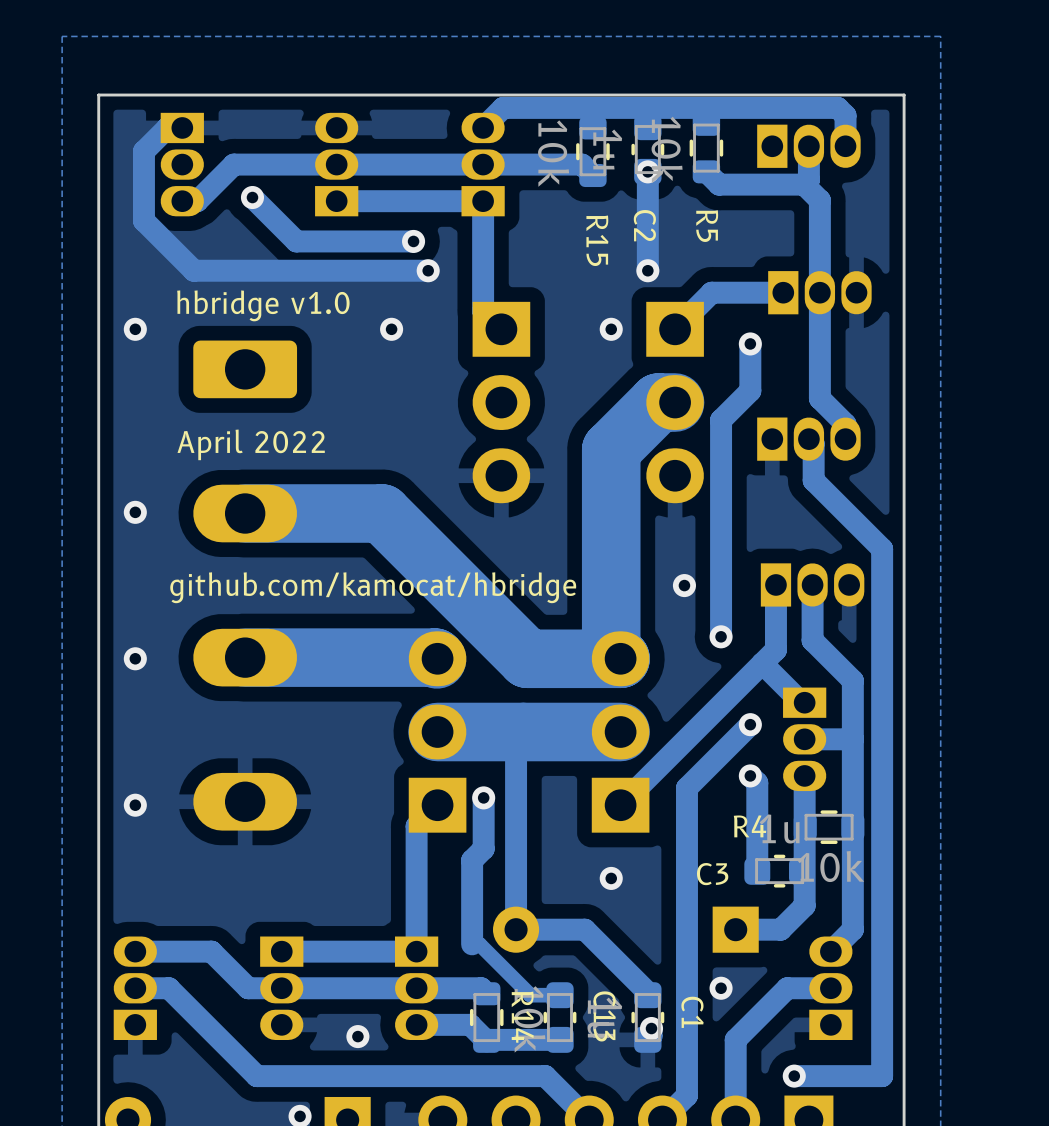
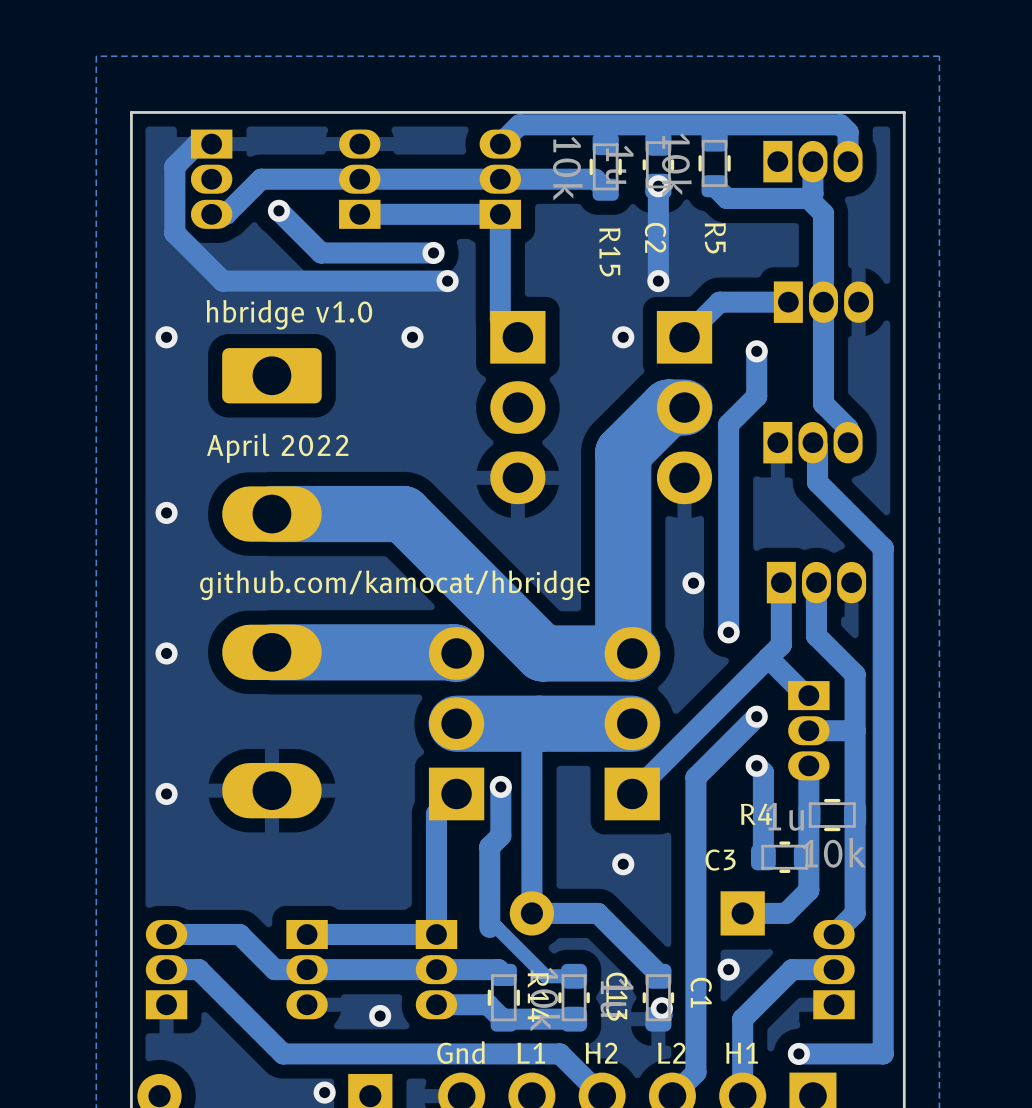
text: none -> Gnd (461, 1052)
text: none -> L1 (531, 1053)
text: none -> H2 (601, 1053)
text: none -> L2 (671, 1053)
text: none -> H1 (742, 1053)

